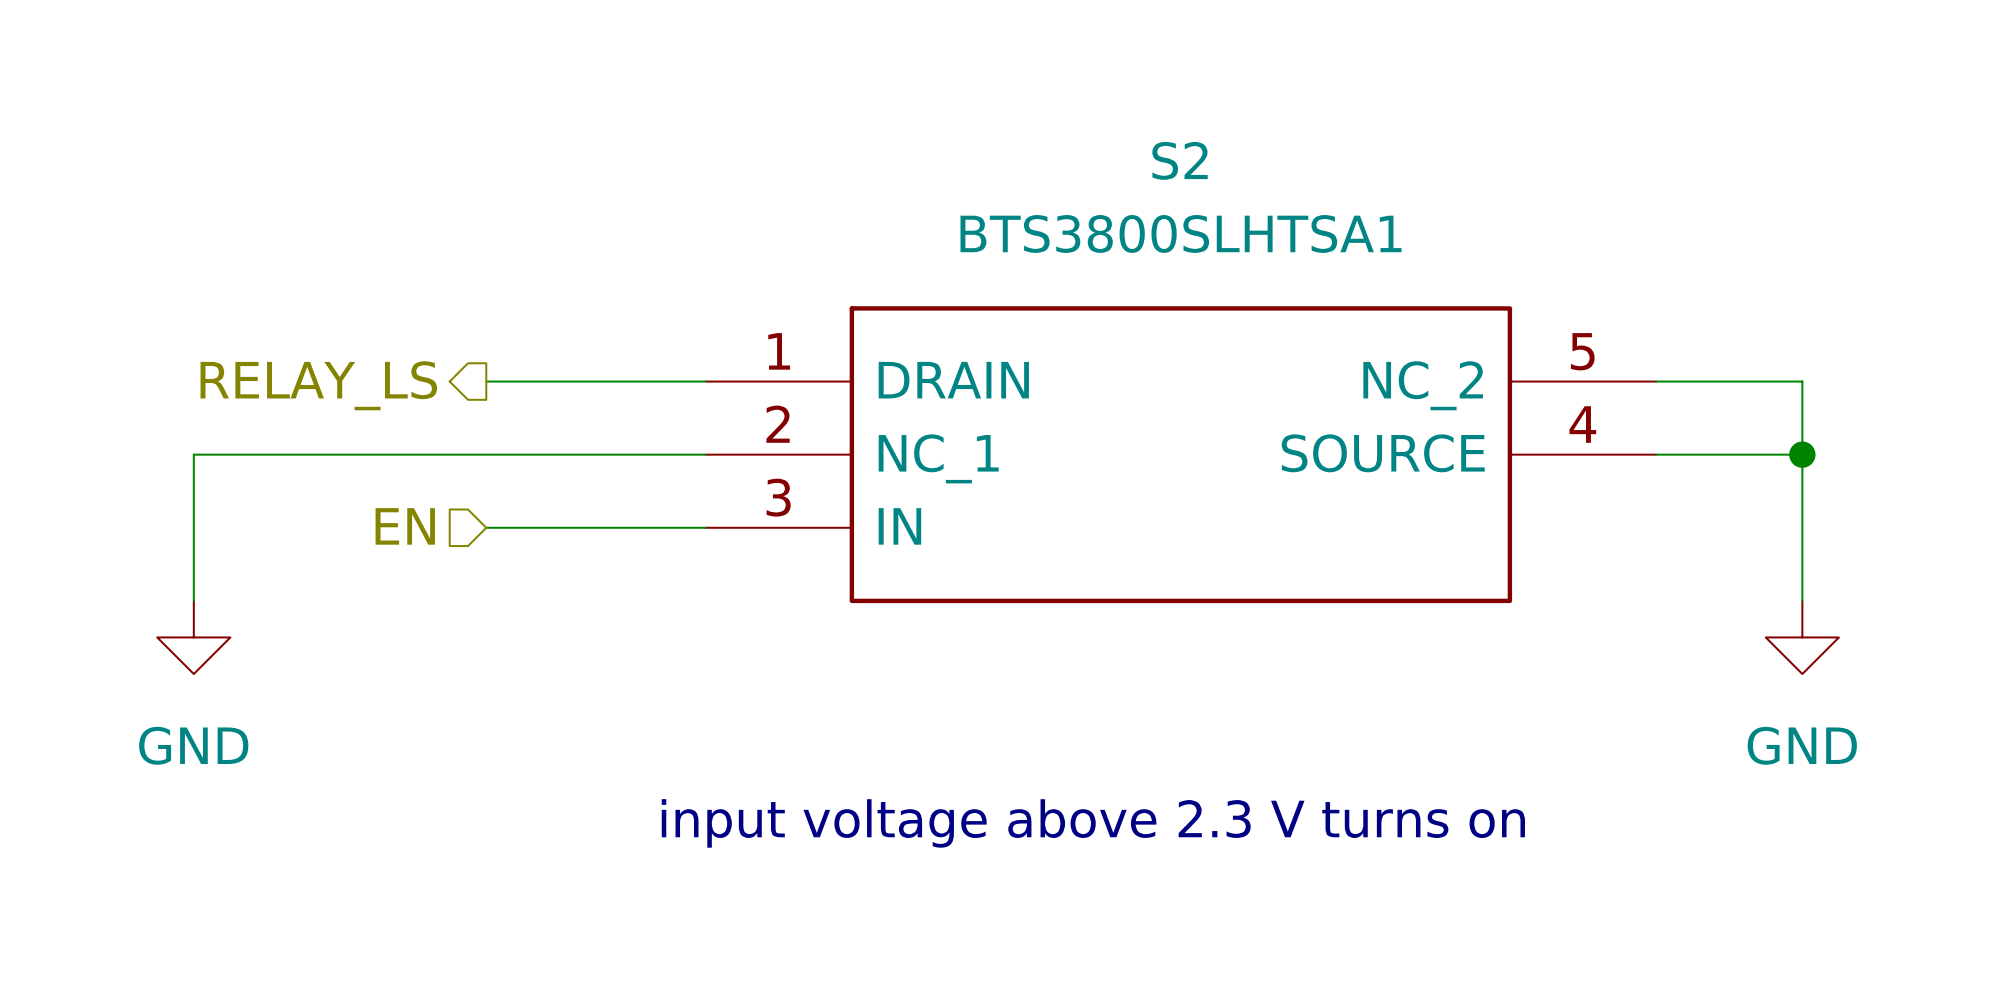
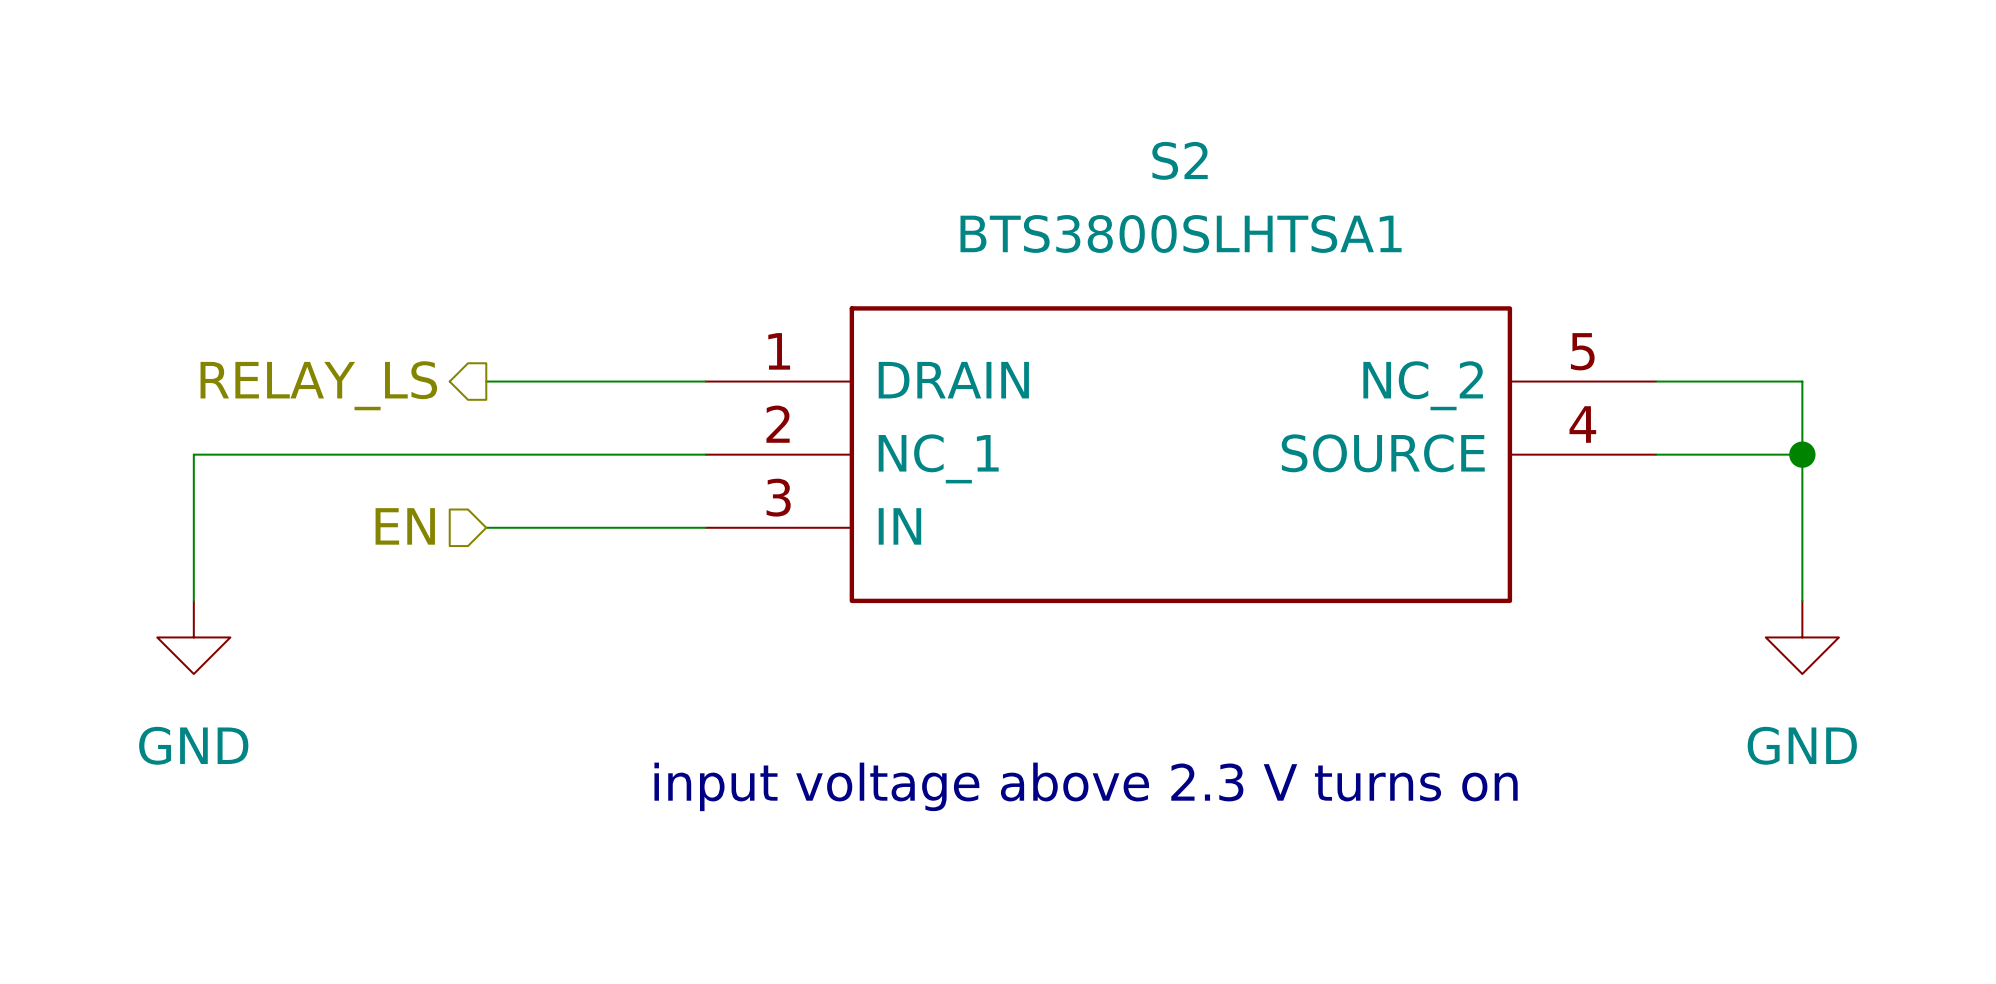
text position: input voltage above 2.3 V turns on (1093, 823) -> input voltage above 2.3 V turns on (1086, 786)

